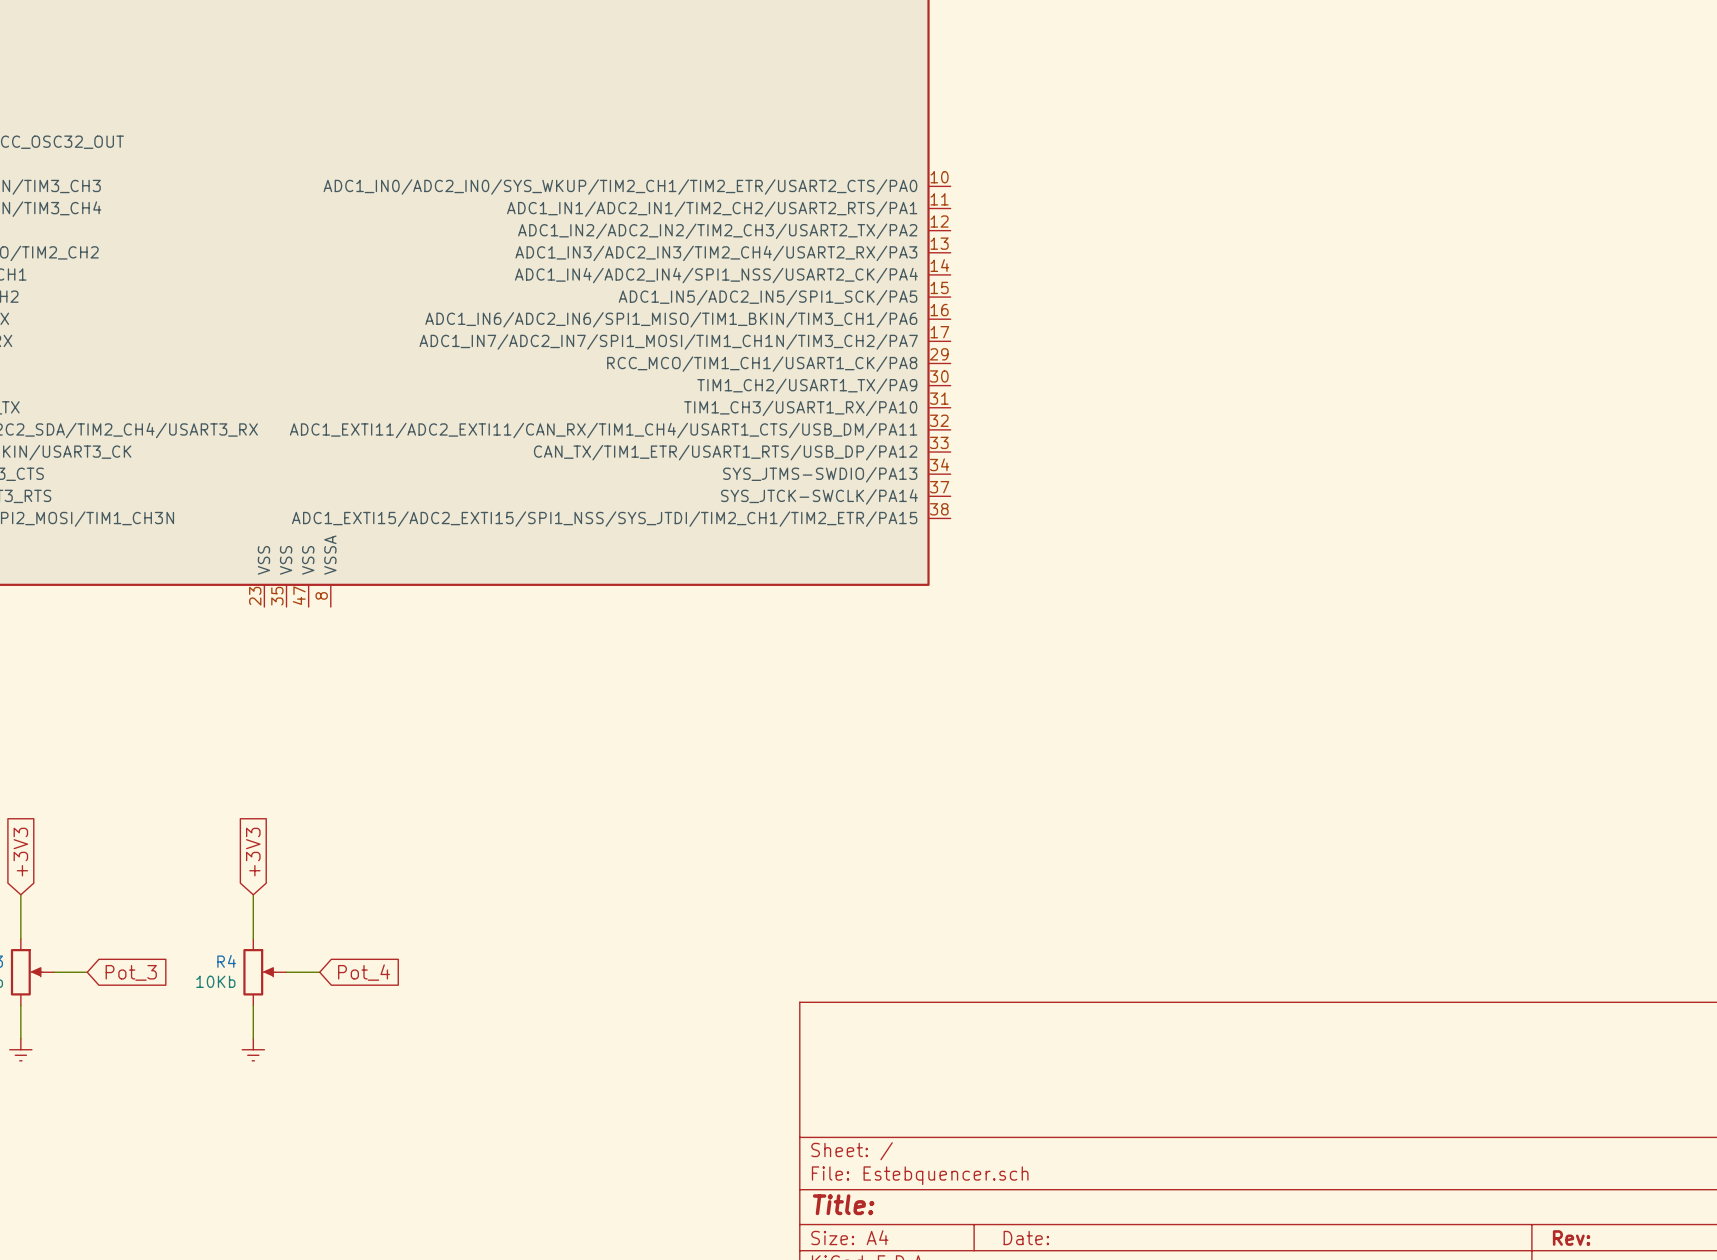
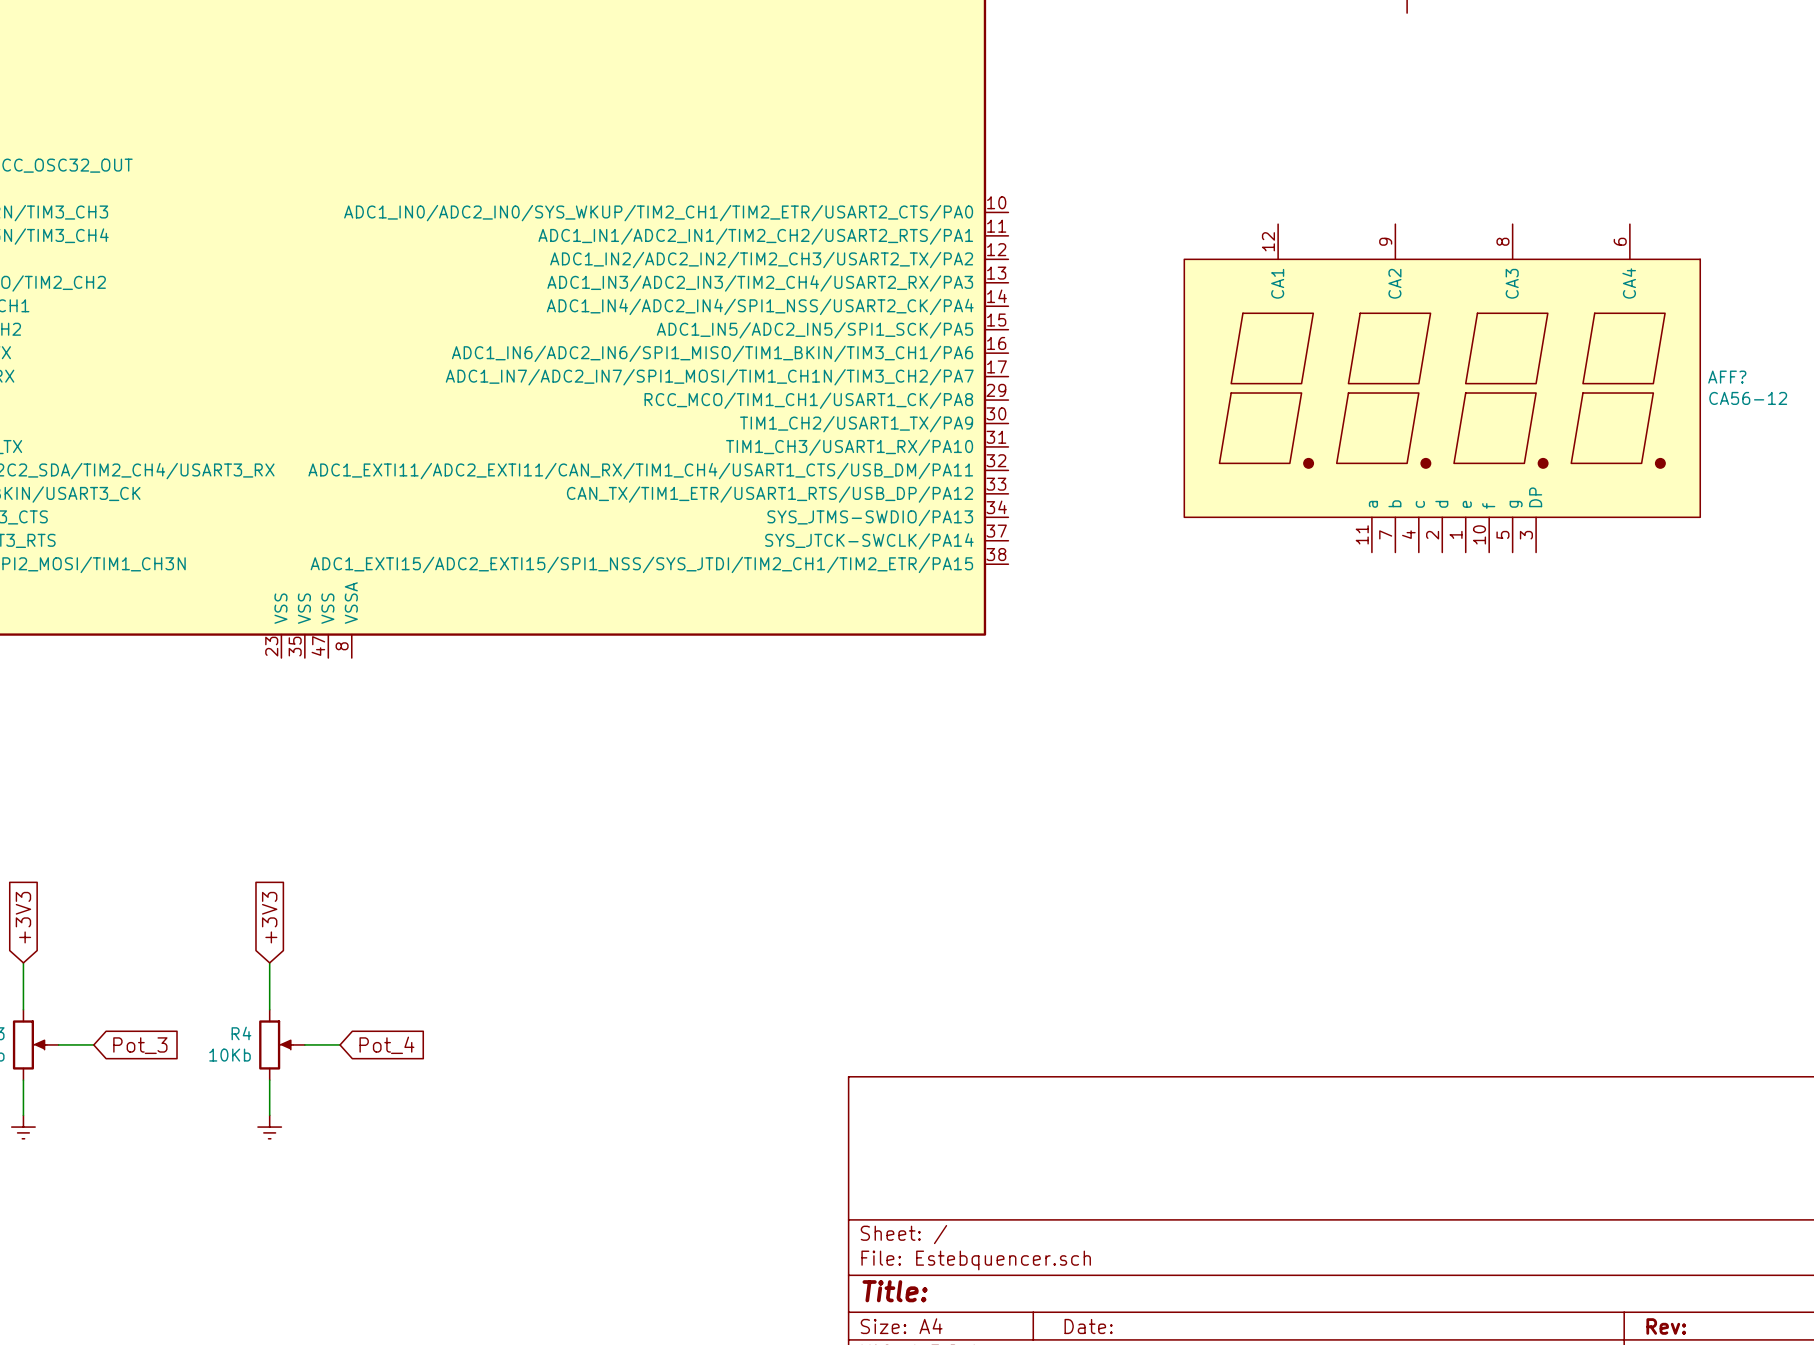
AFF?: none -> CA56-12 (1442, 388)

